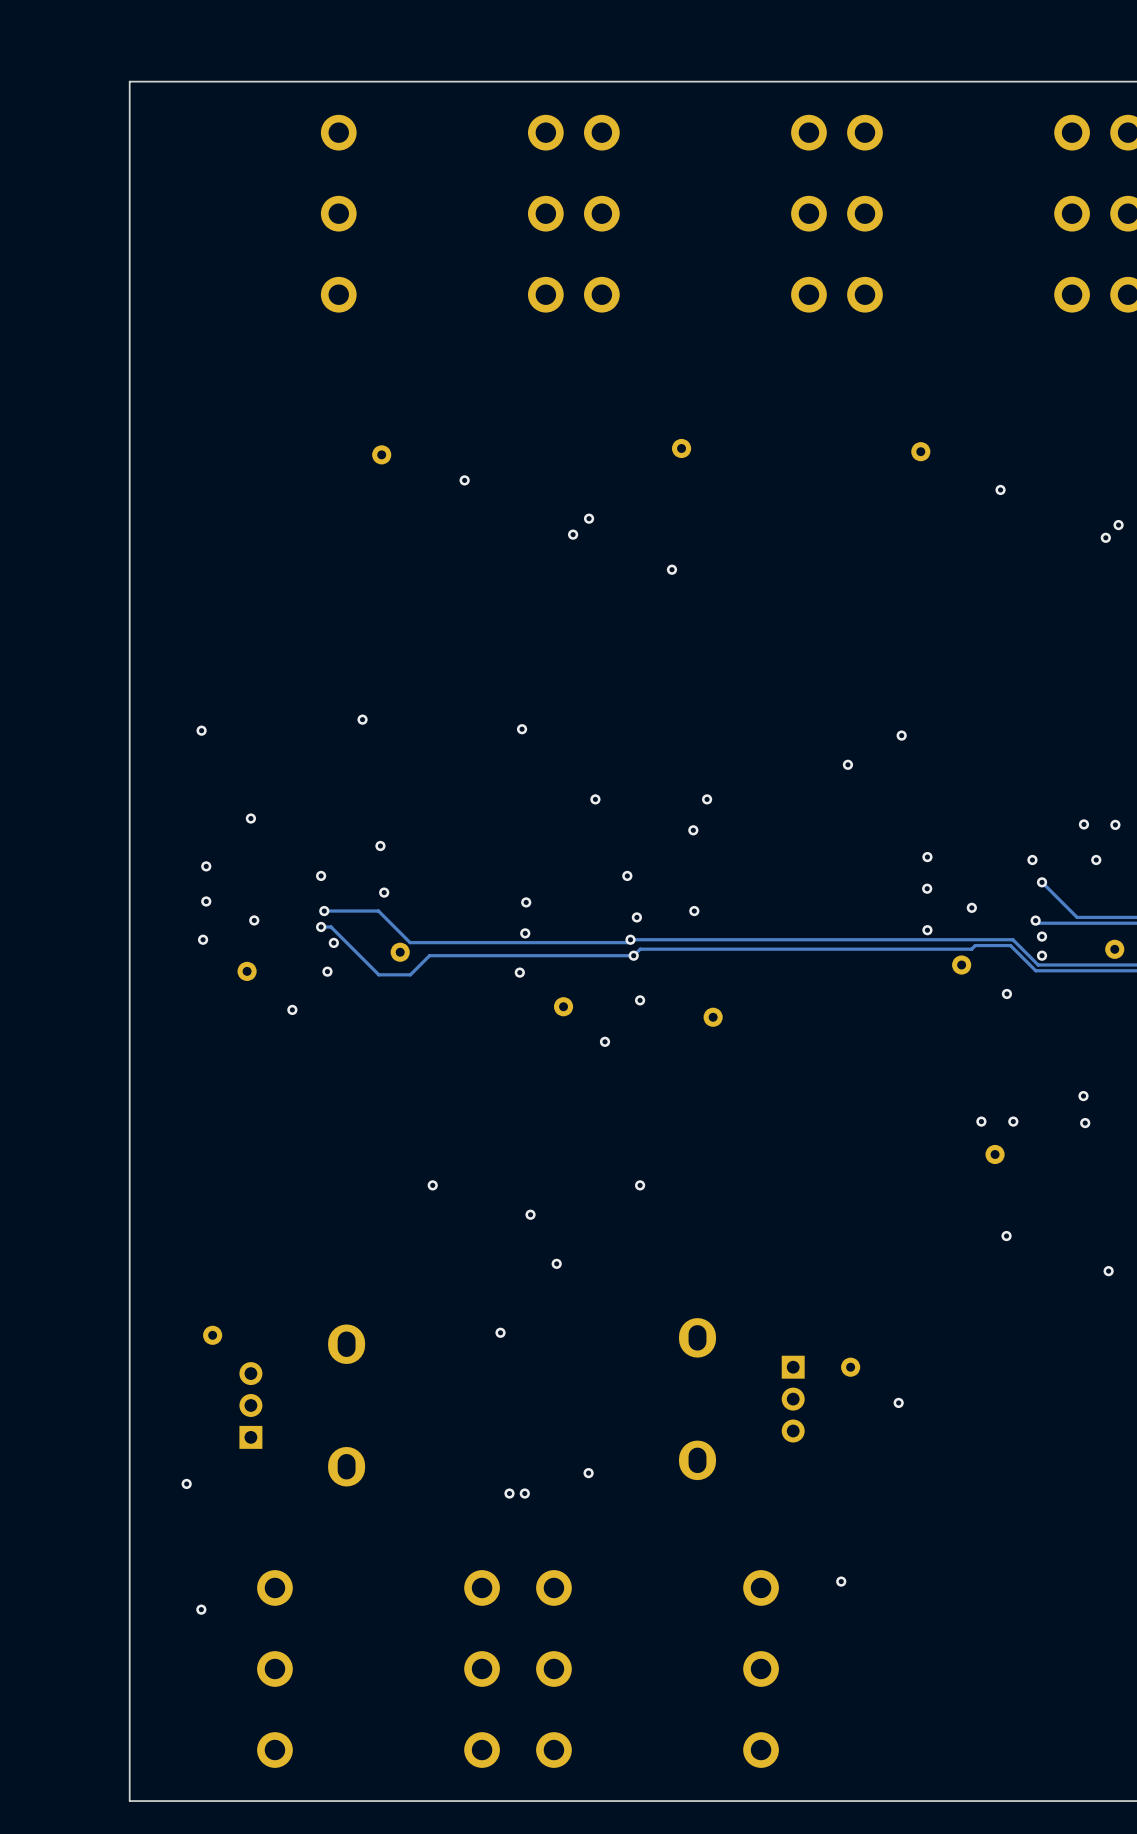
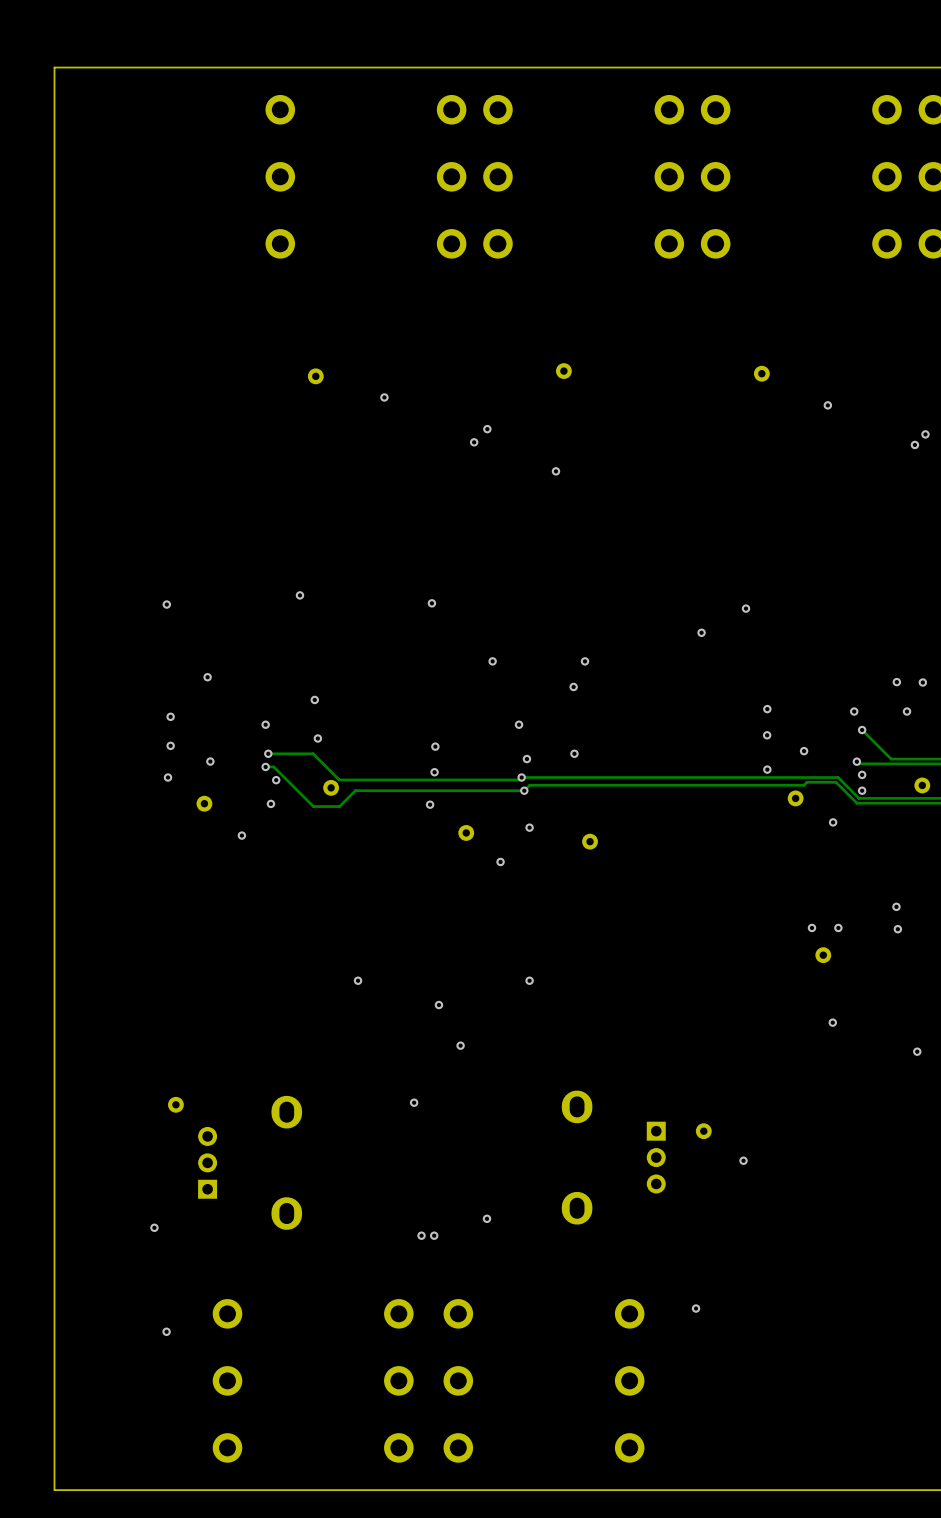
board edge: (129, 81) (129, 1801) -> (107, 67) (54, 67) (54, 1490) (107, 1490)

